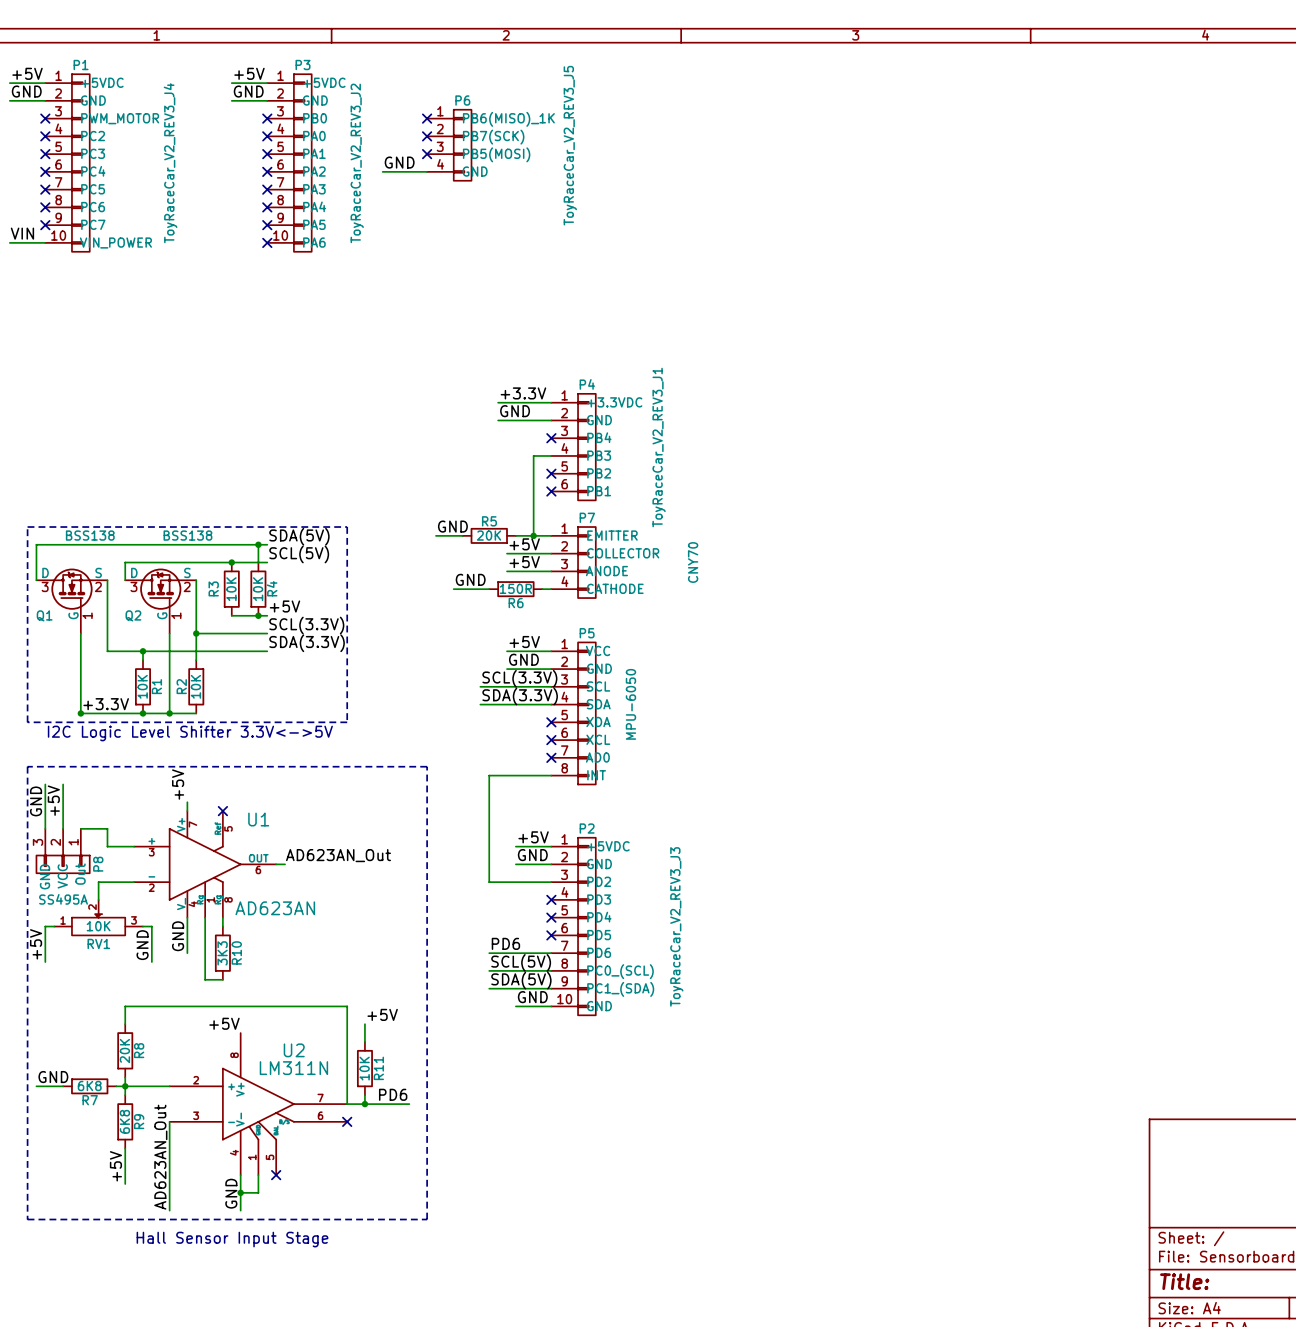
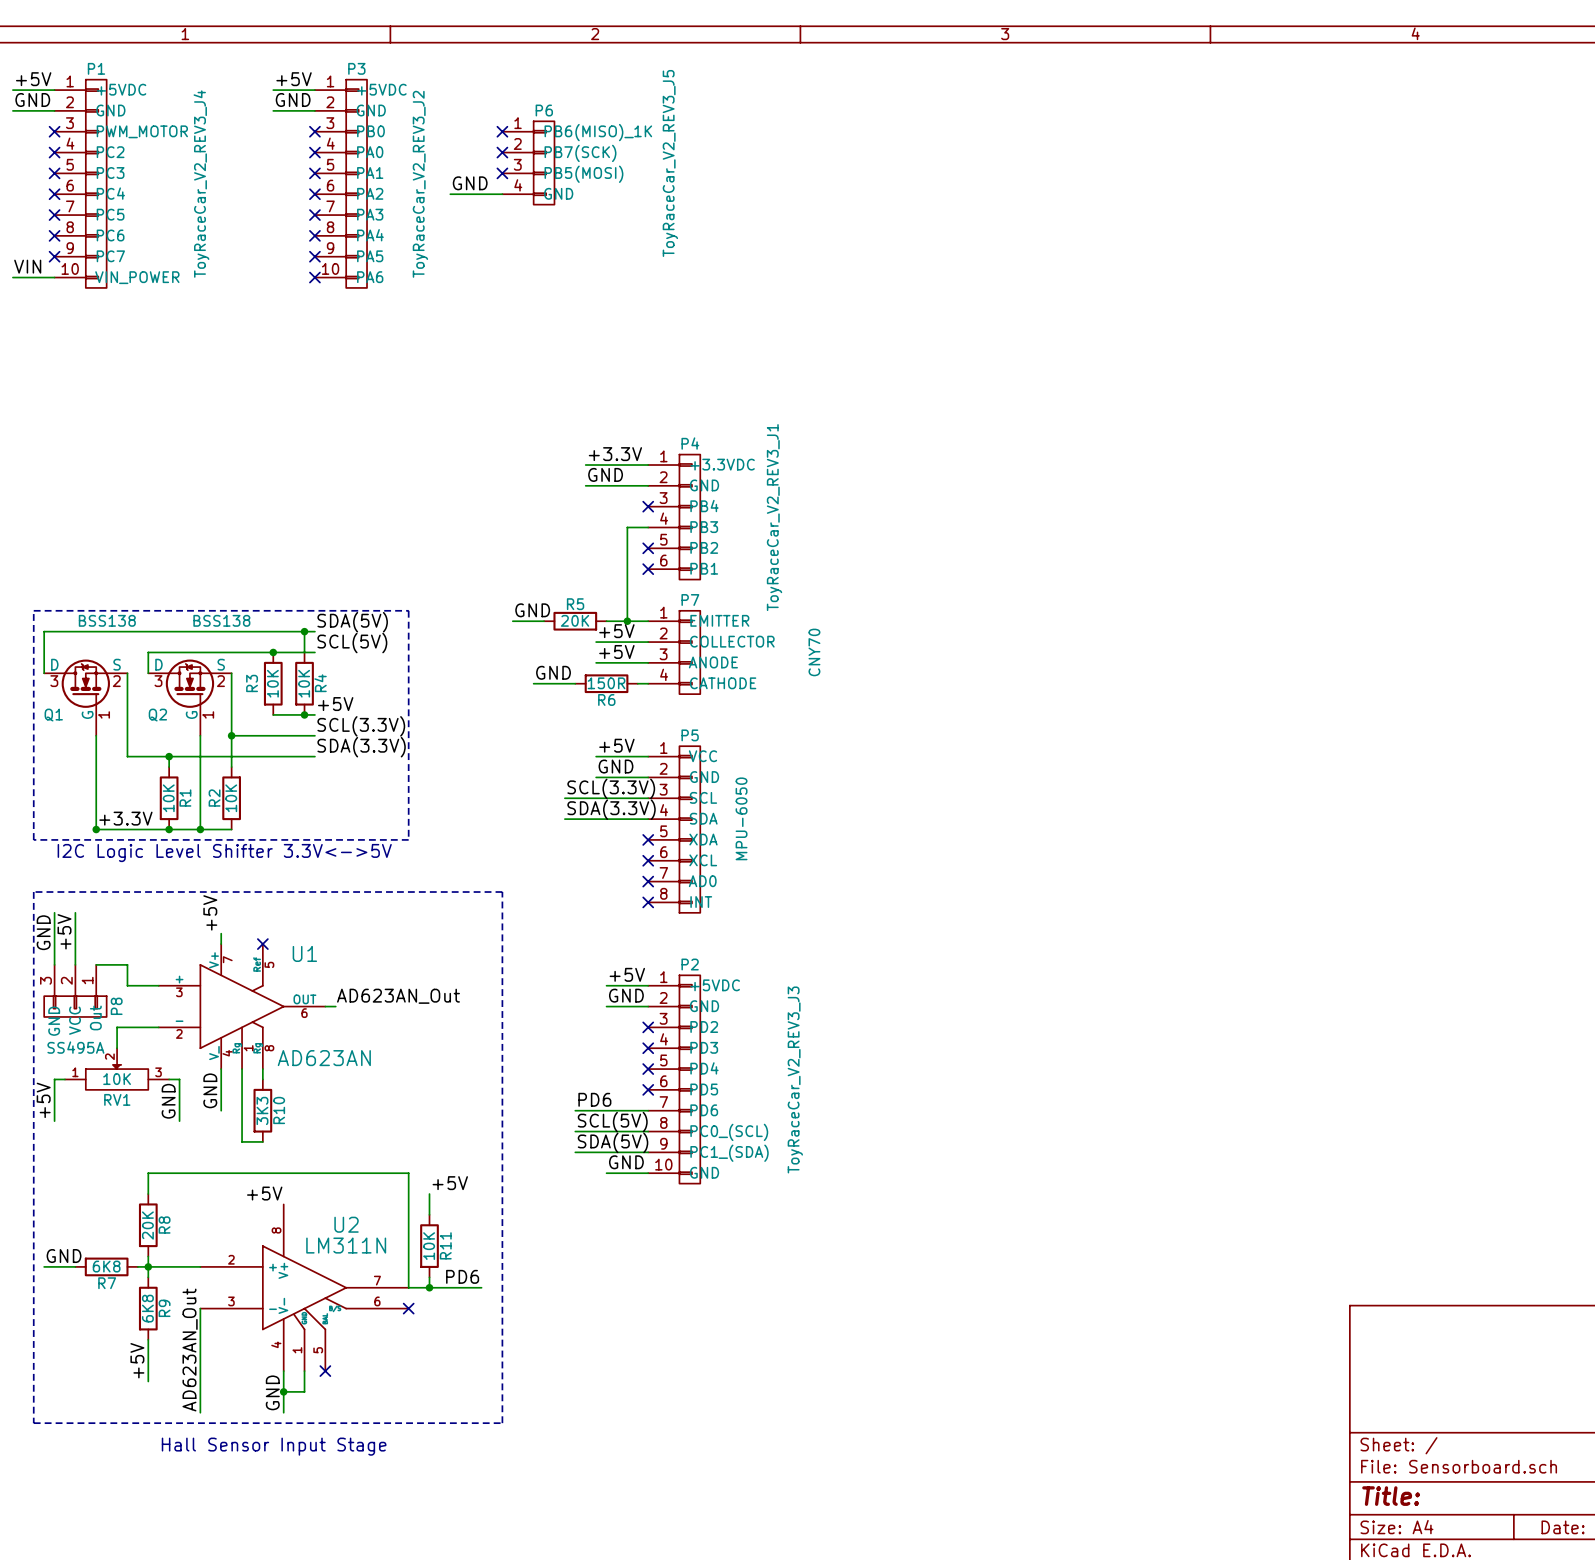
wire: (551, 775) (489, 775) (489, 882) (551, 882) -> none
no-connect mark: none -> (648, 902)
no-connect mark: none -> (648, 1027)

